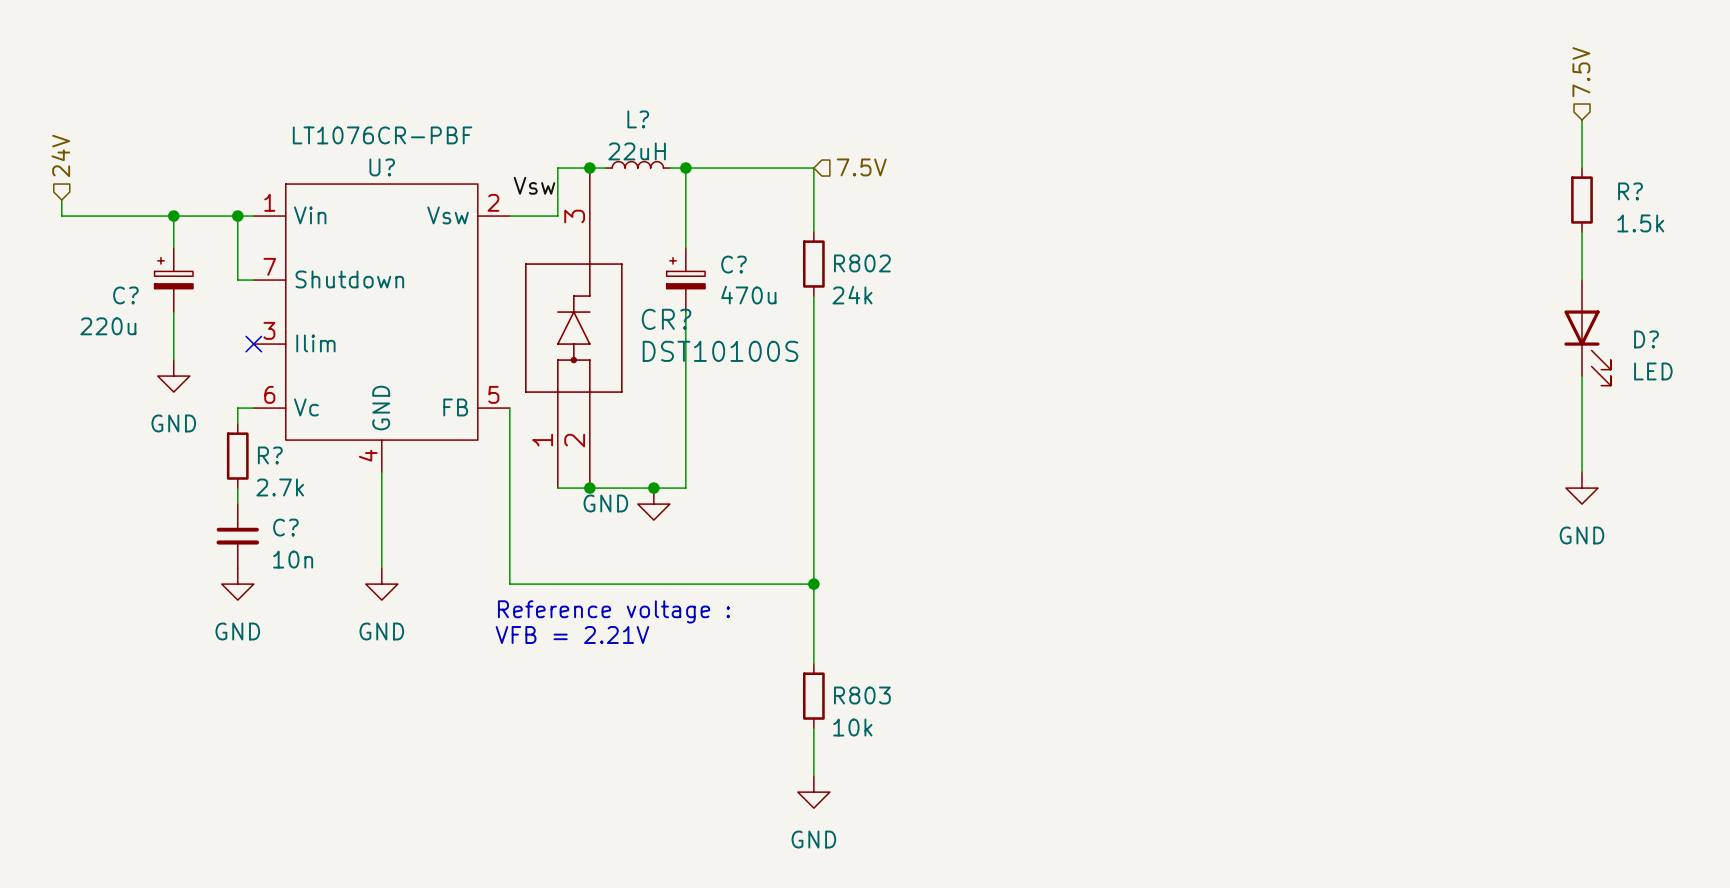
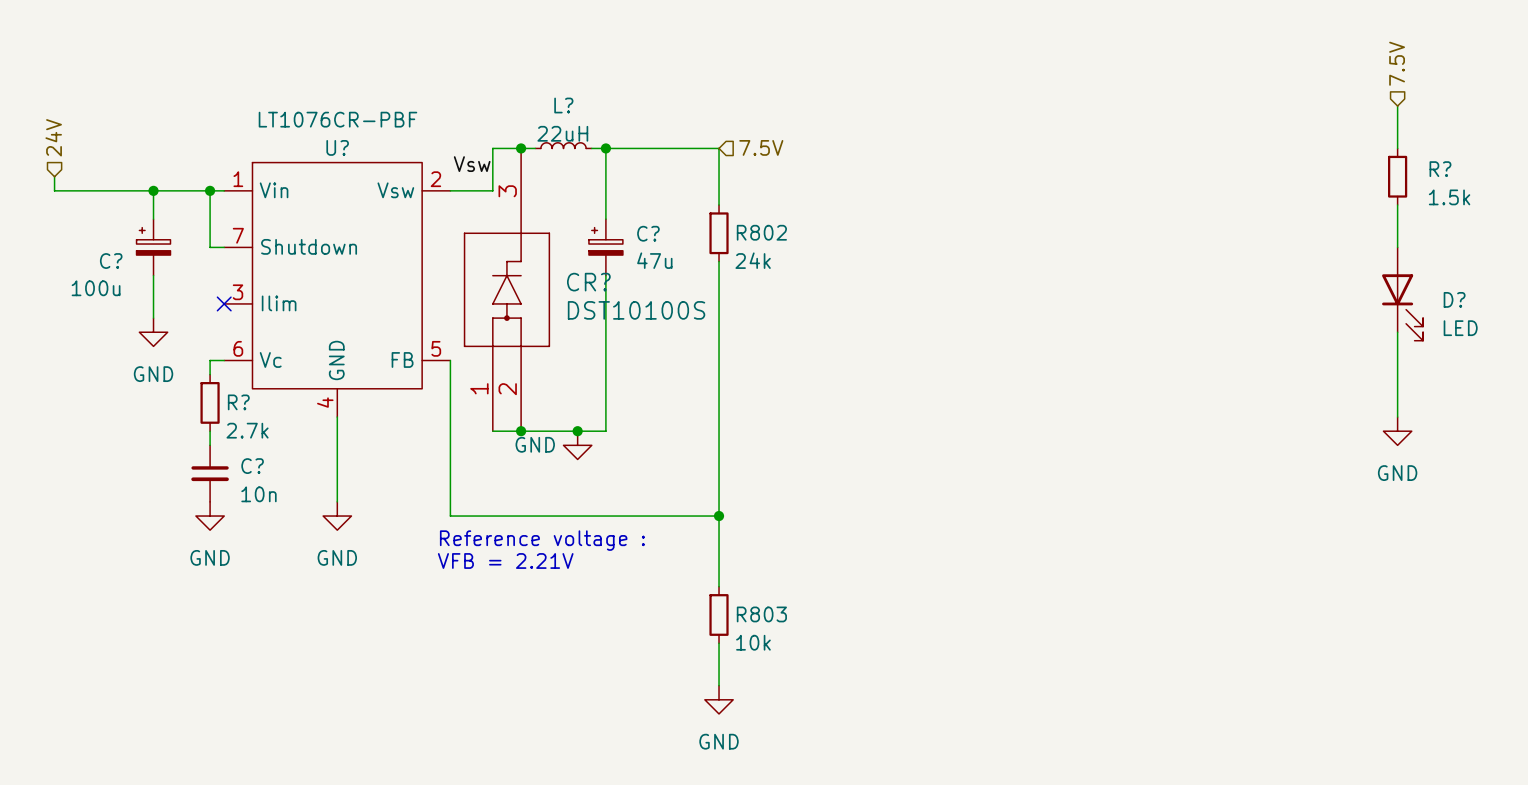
C? value: 470u (748, 295) -> 47u (654, 260)
C? value: 220u (108, 326) -> 100u (96, 288)

